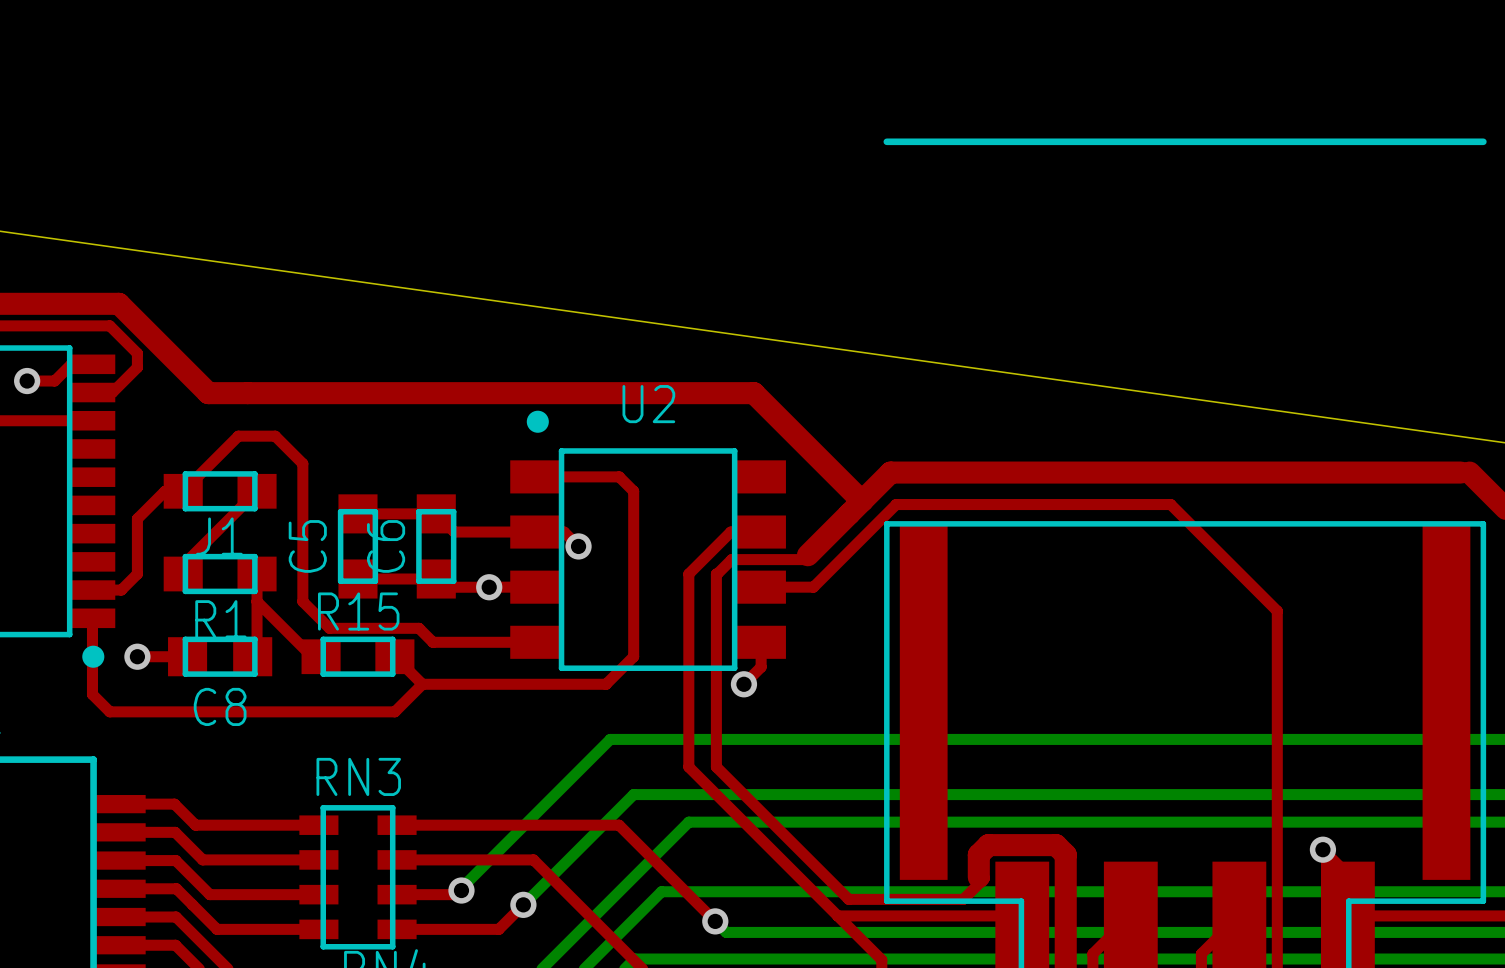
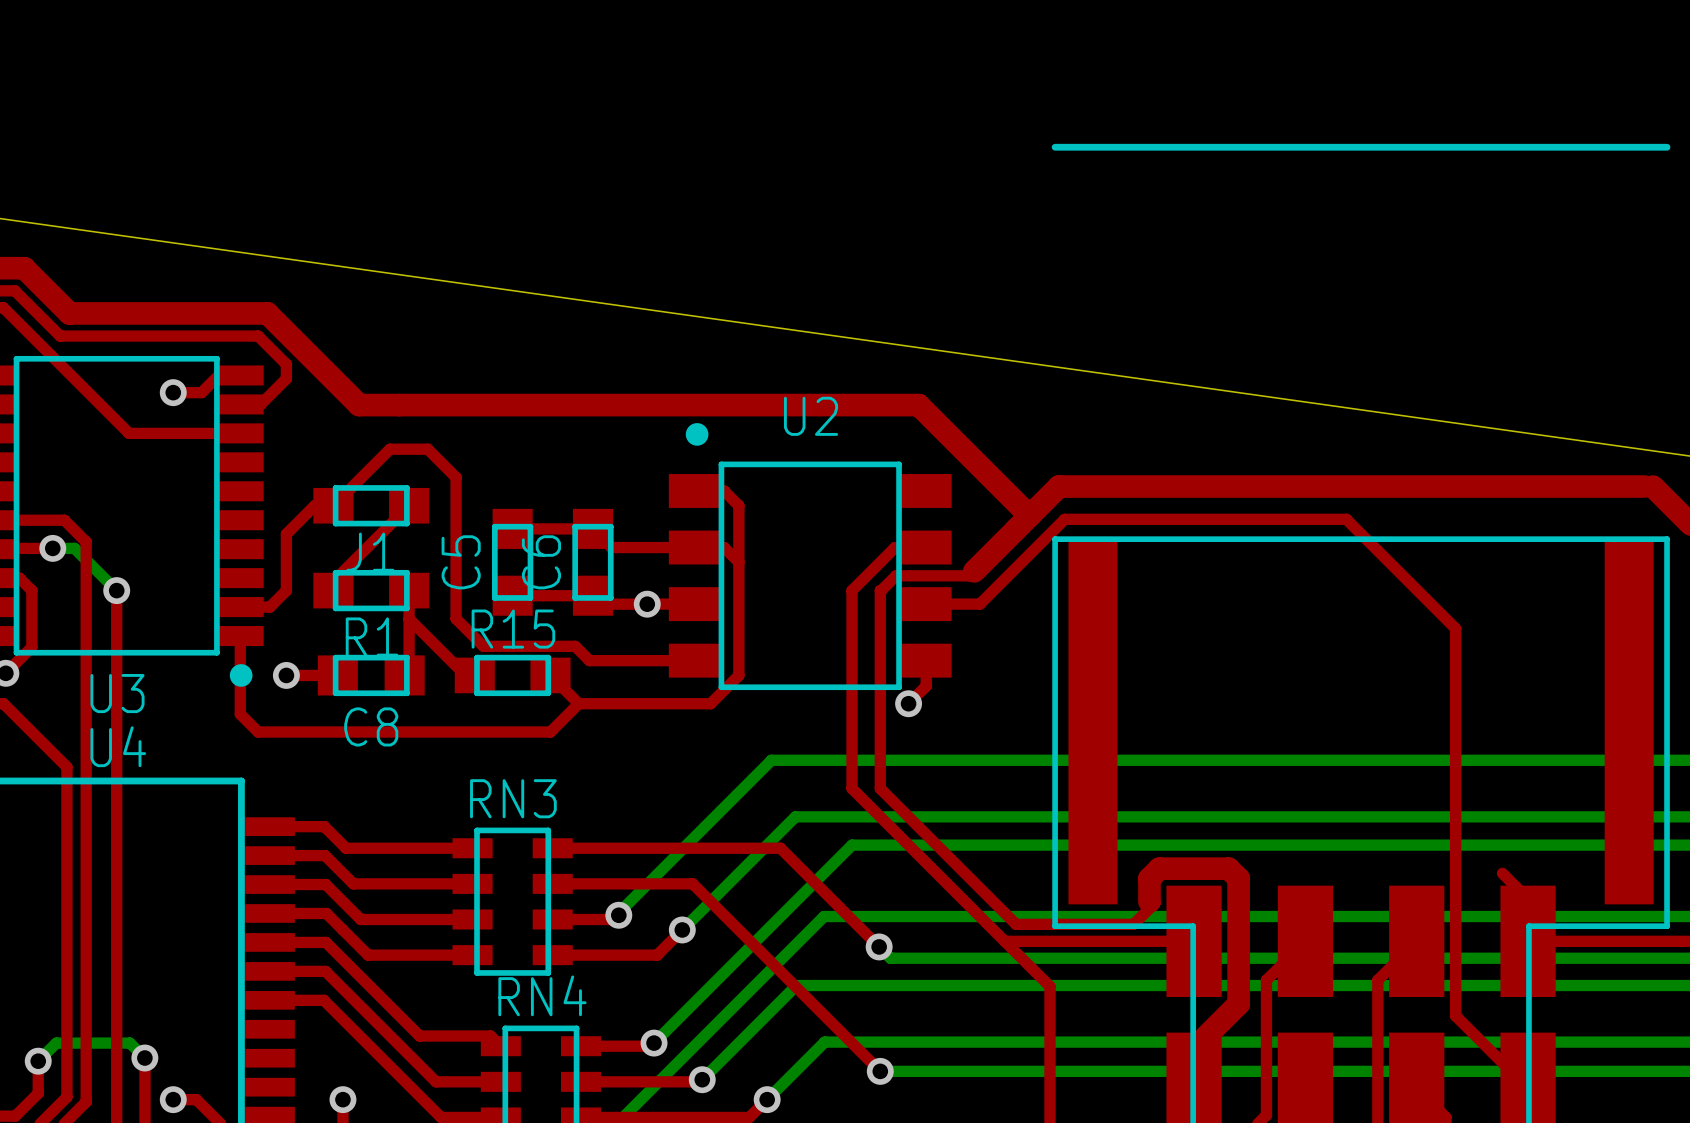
top track: (564, 476) (619, 476) (633, 491) (633, 656) (606, 684) (550, 684) -> (724, 490) (738, 505) (738, 675) (710, 703)
via: (578, 546) -> none
via: (1322, 849) -> none

